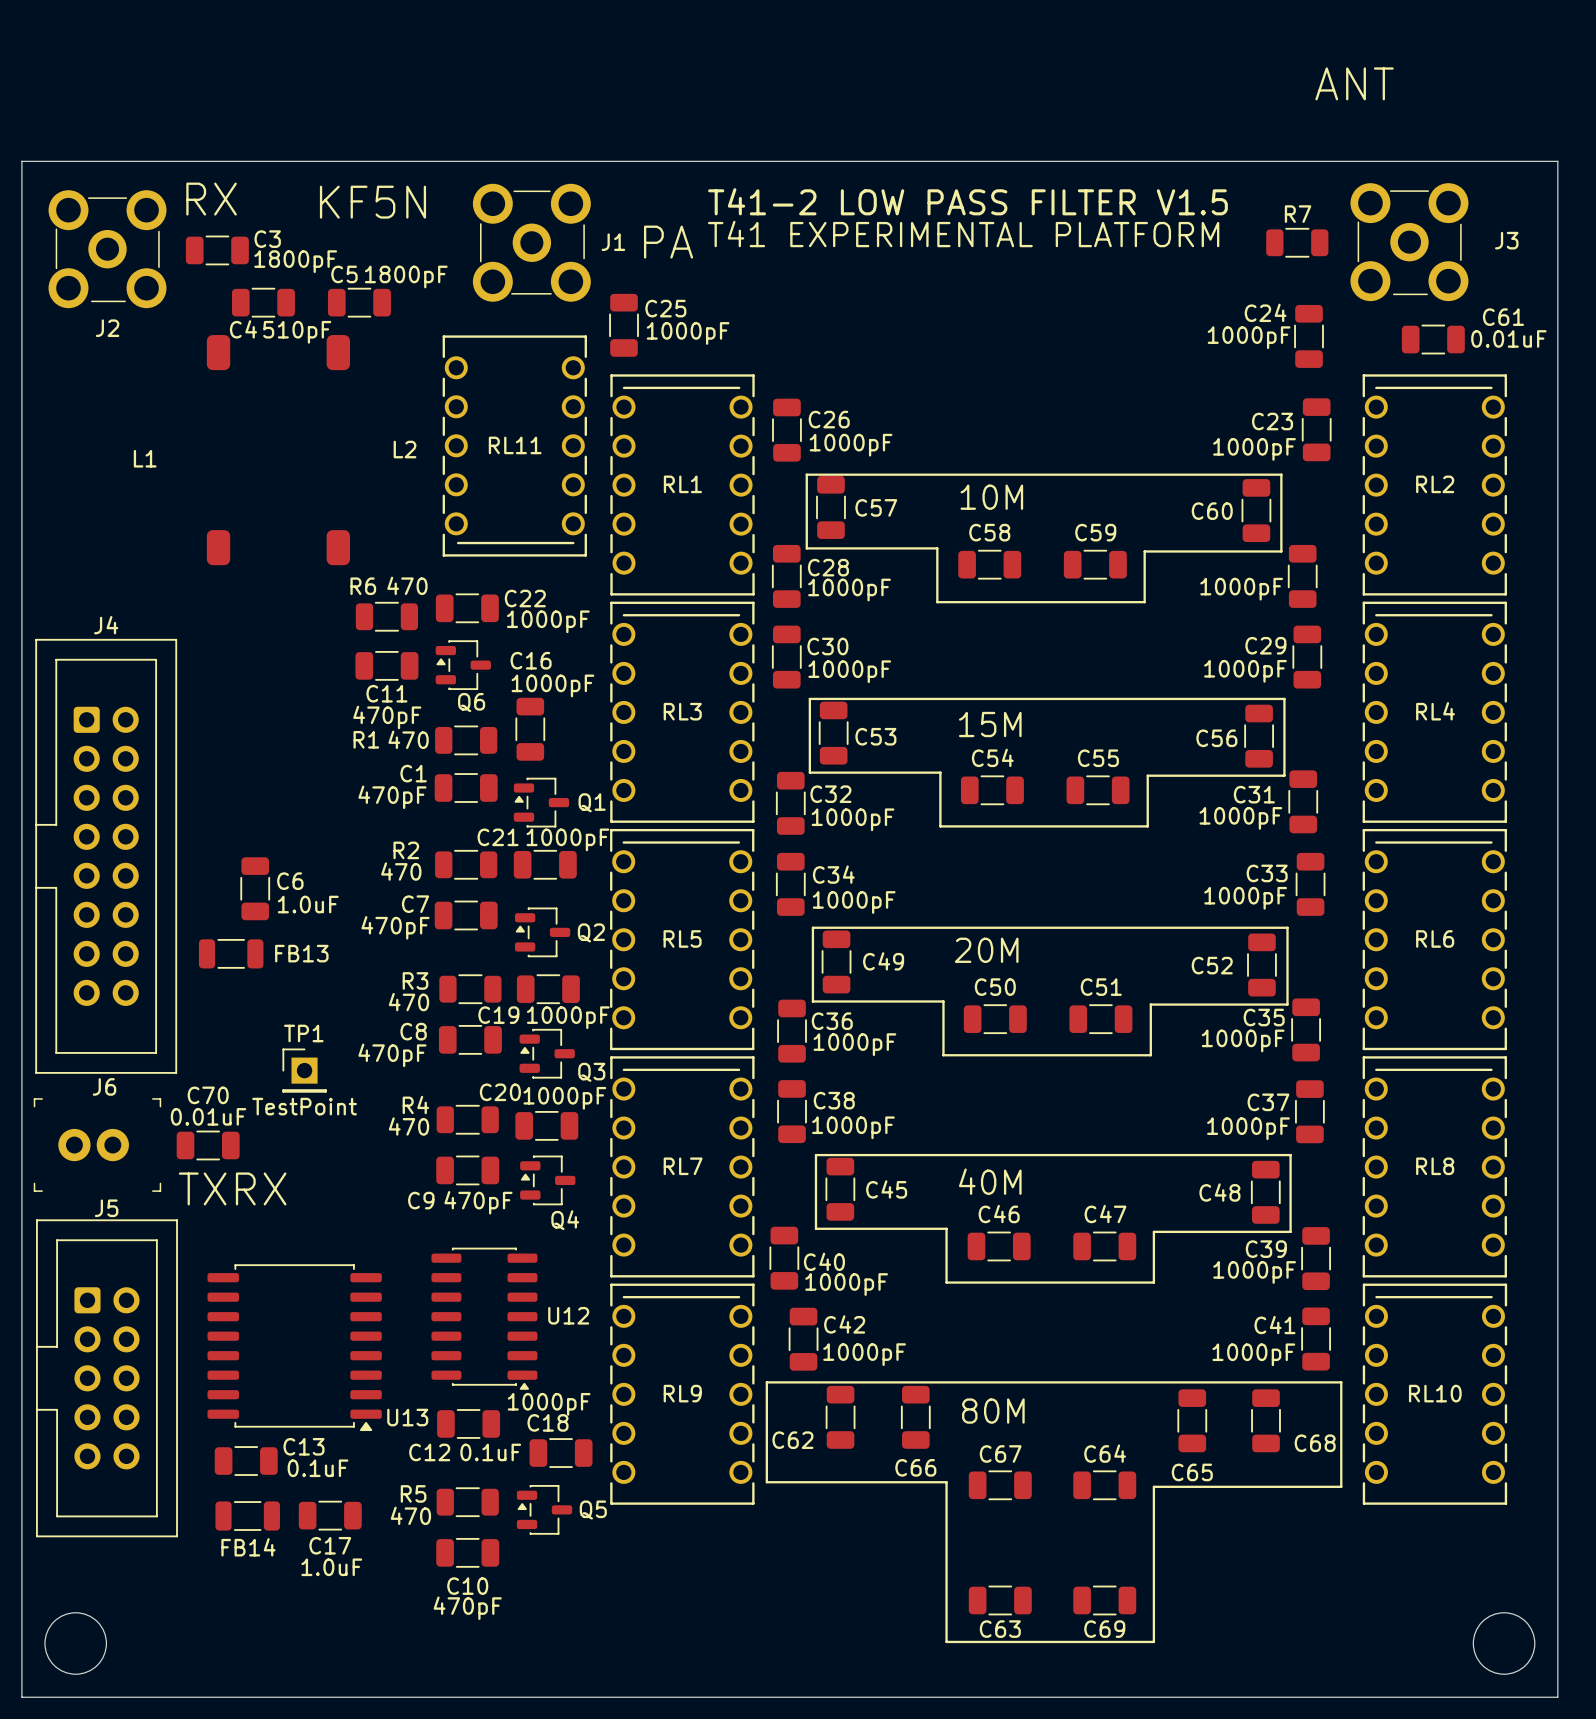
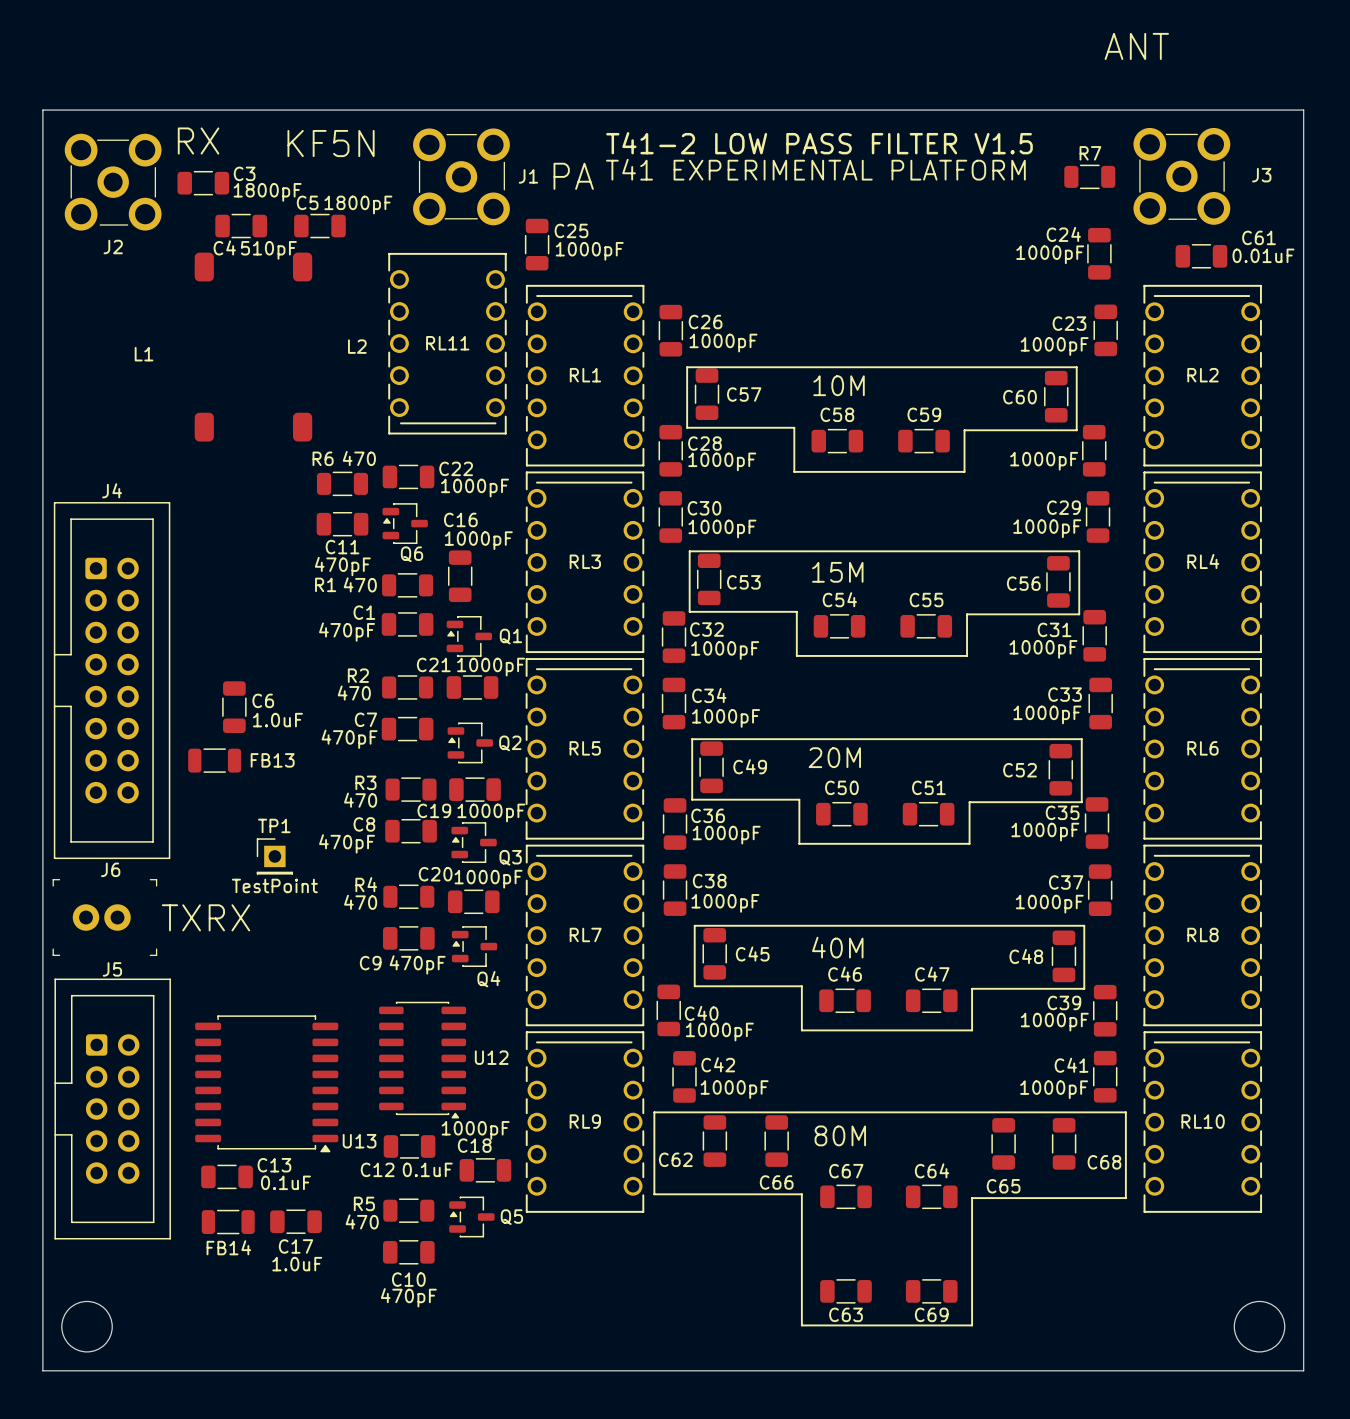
C70: 0.01uF (208, 1145) -> none
text position: TXRX (232, 1188) -> TXRX (206, 917)

